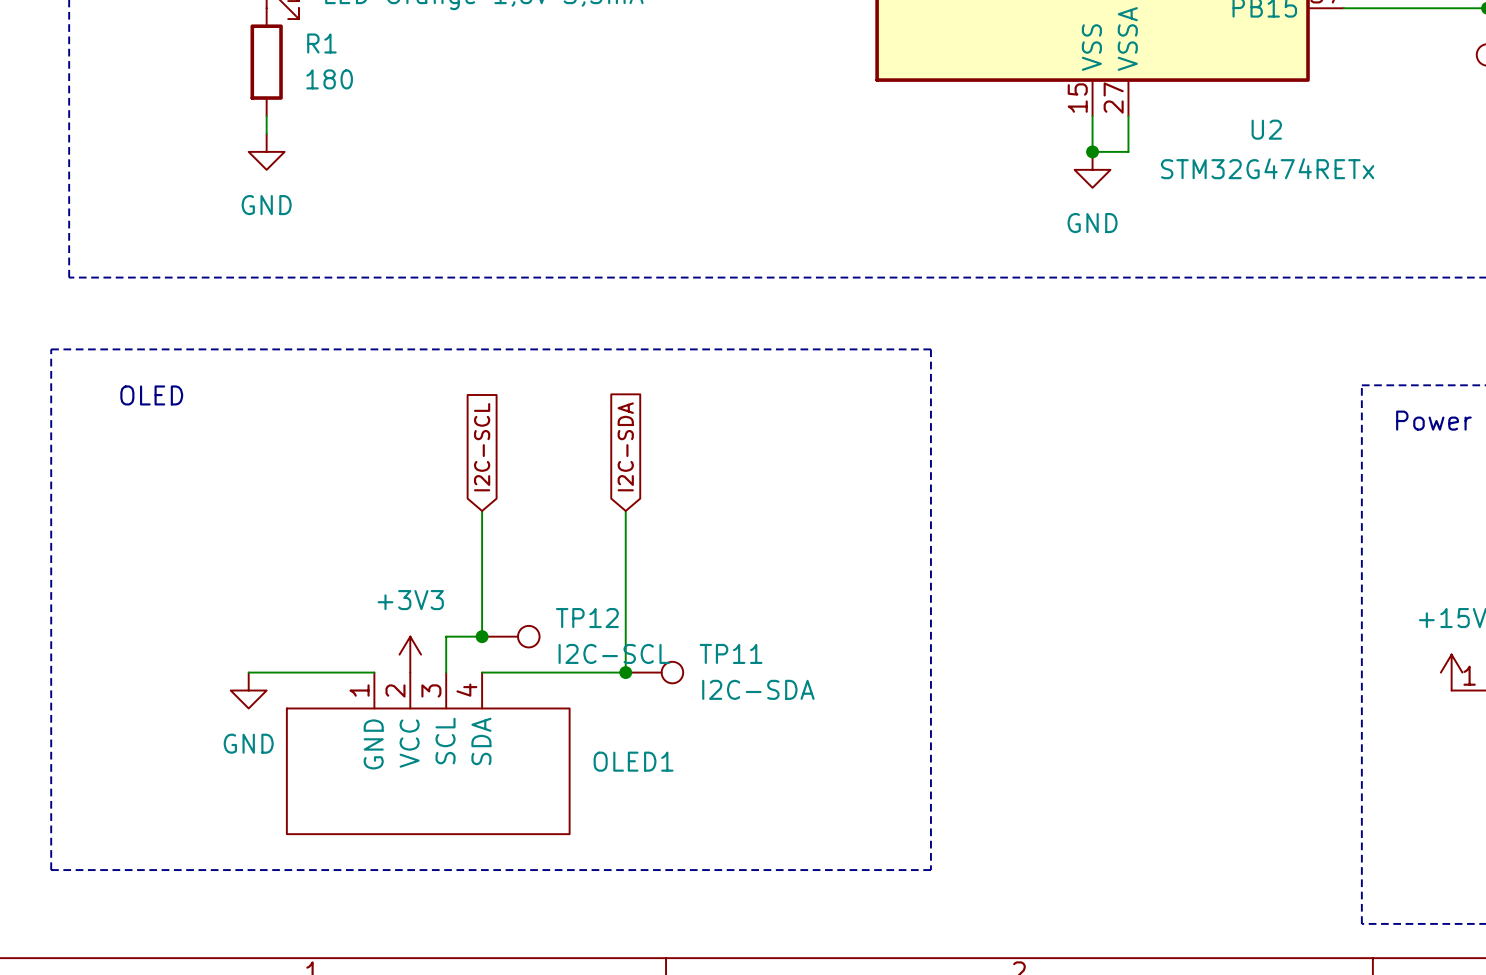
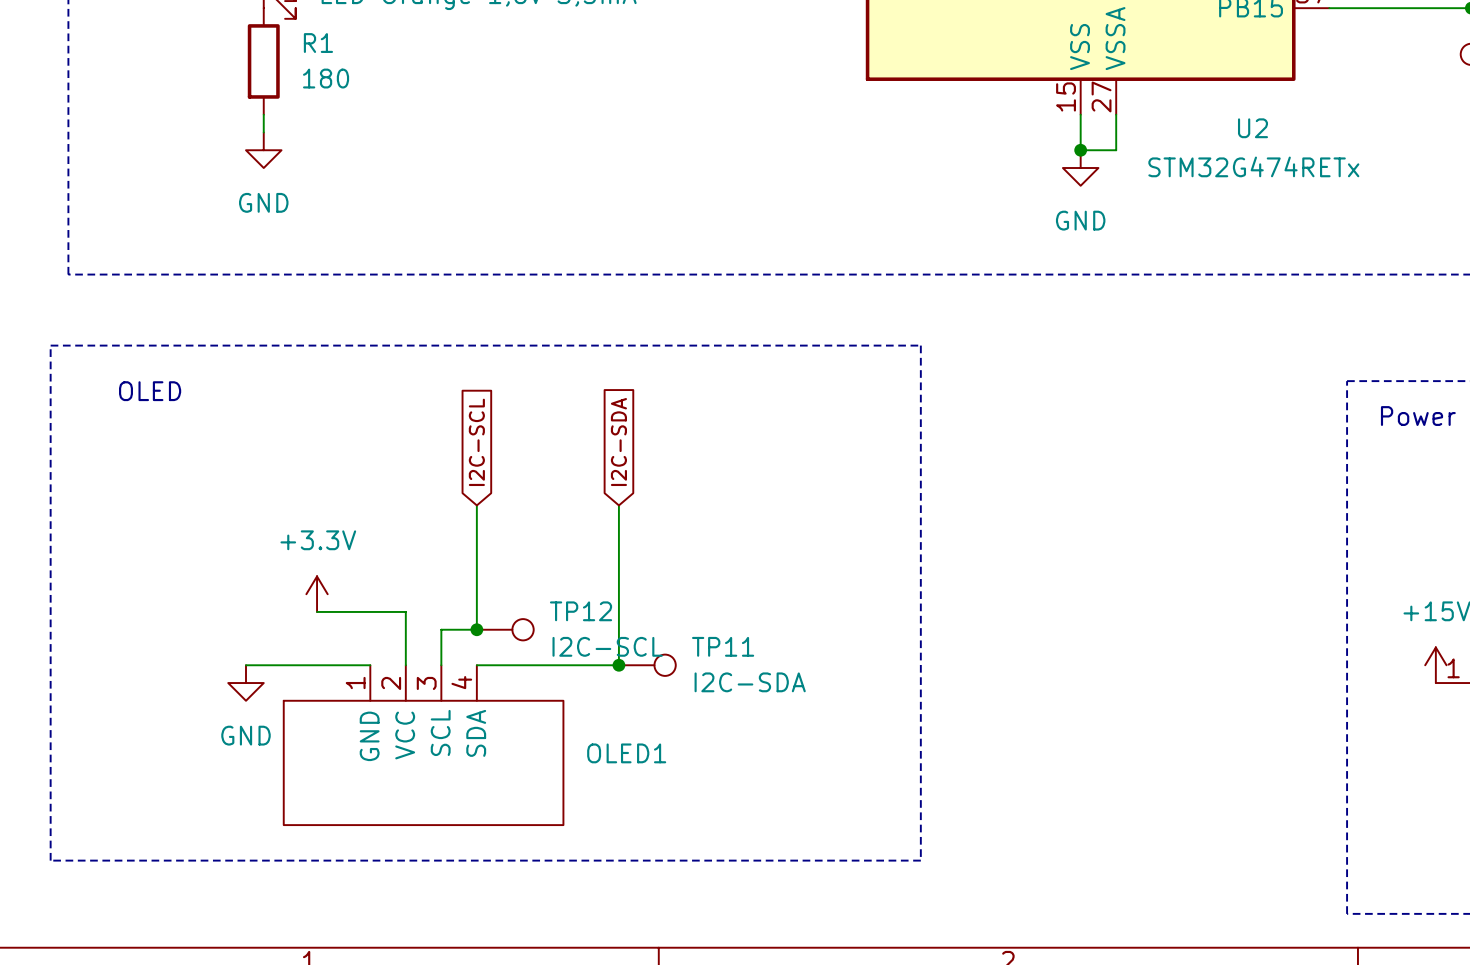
power symbol: none -> +3.3V (317, 594)
wire: none -> (317, 611) (405, 611) (405, 665)
power symbol: +3V3 (410, 654) -> none

